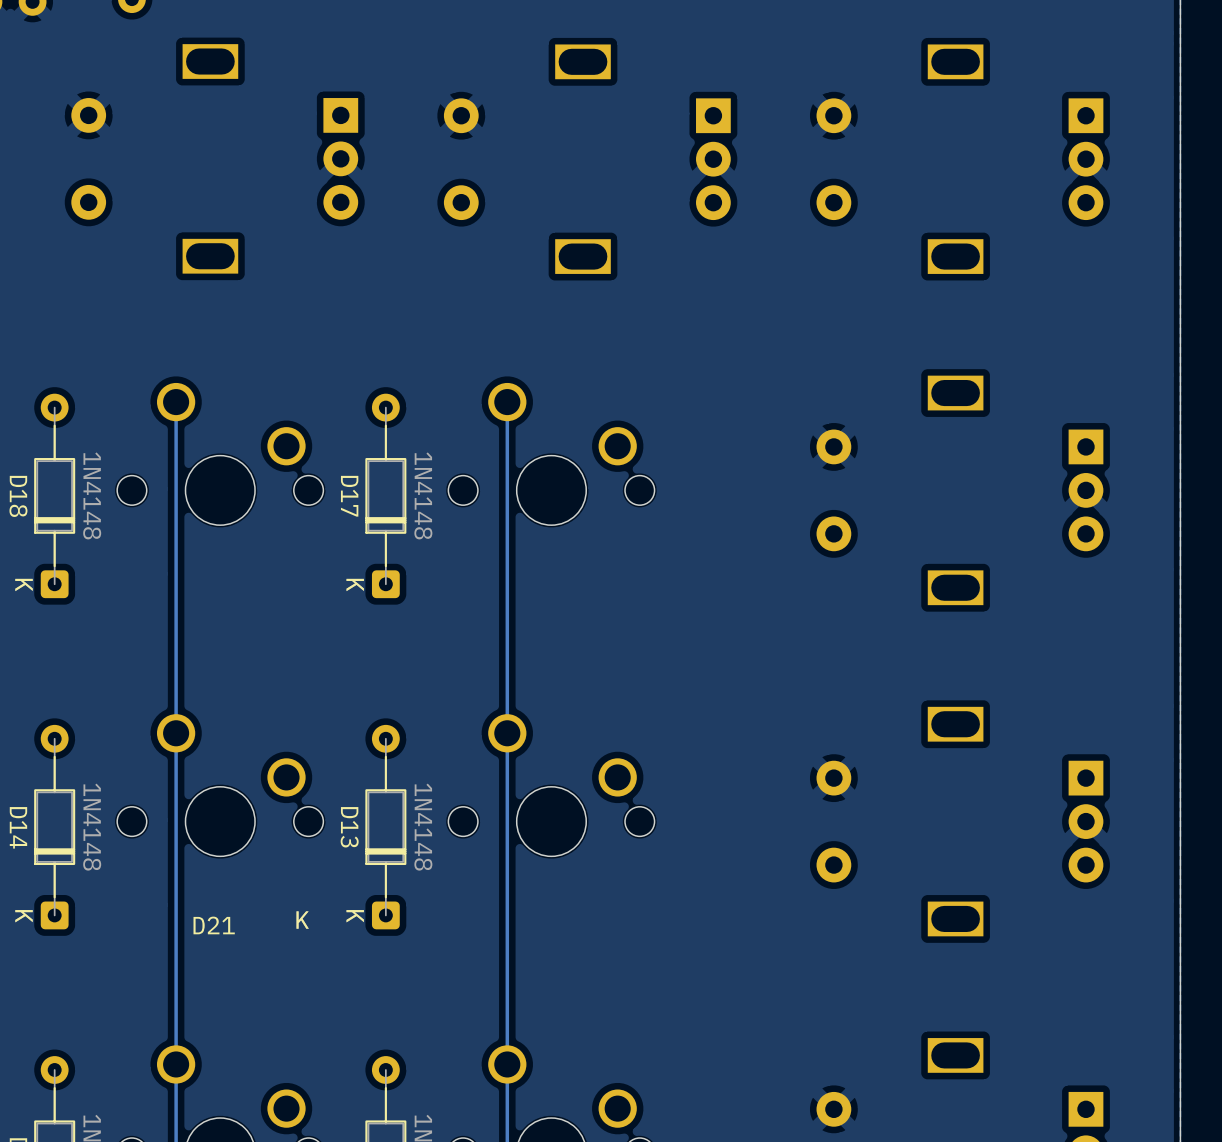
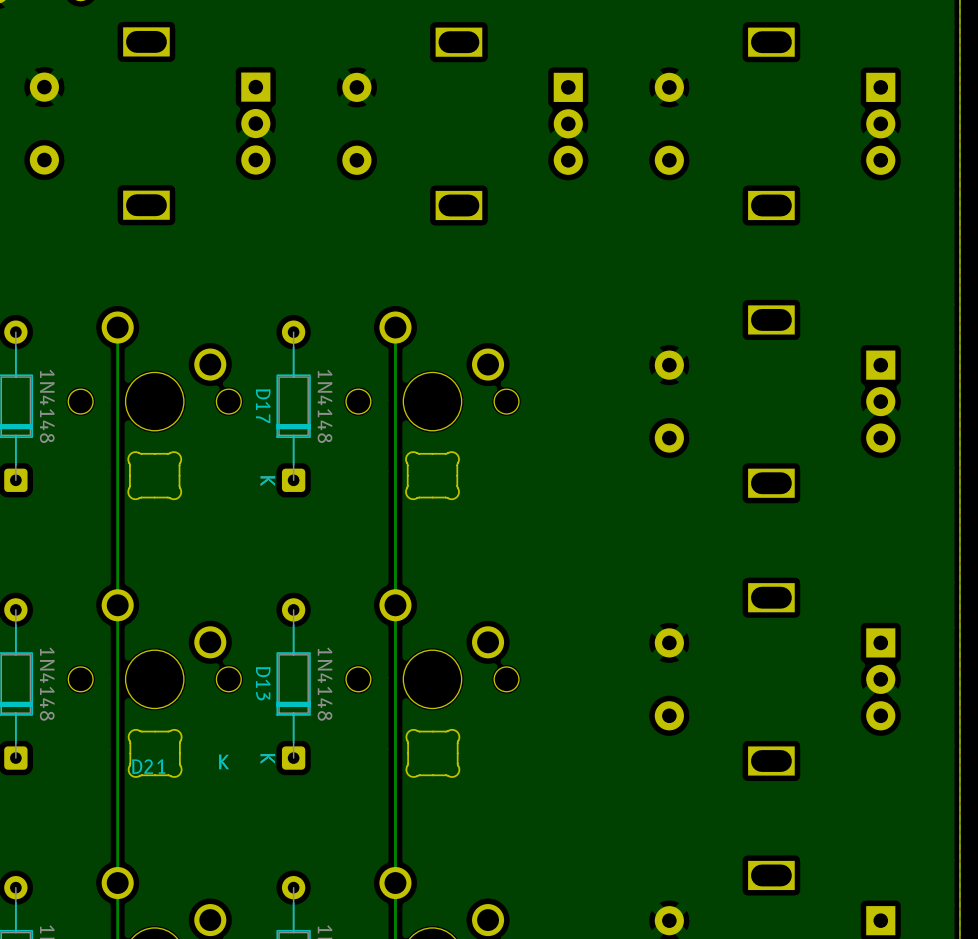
part: none -> (154, 475)
part: none -> (432, 475)
part: none -> (155, 753)
part: none -> (432, 753)

